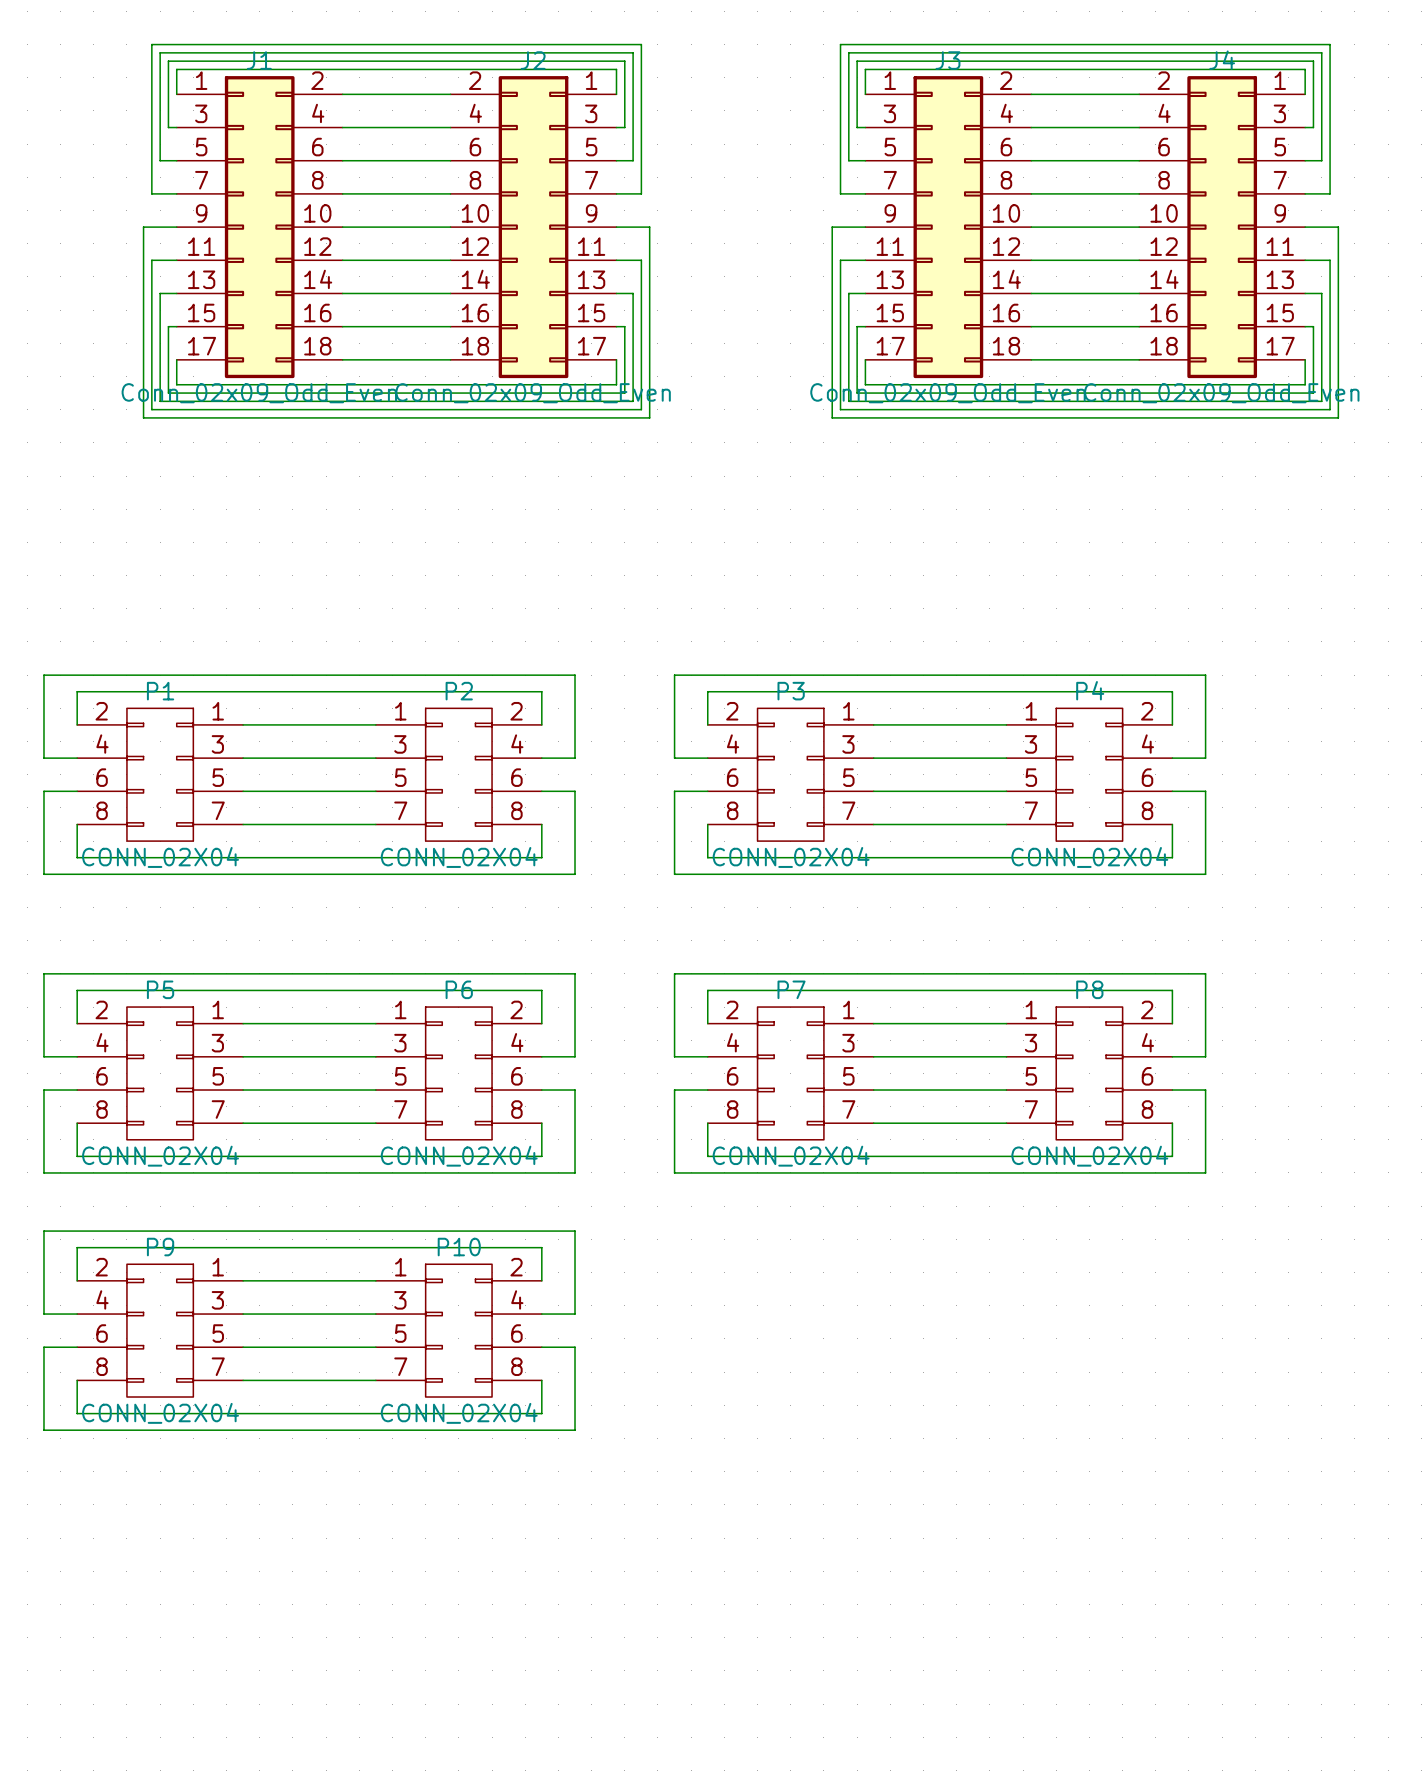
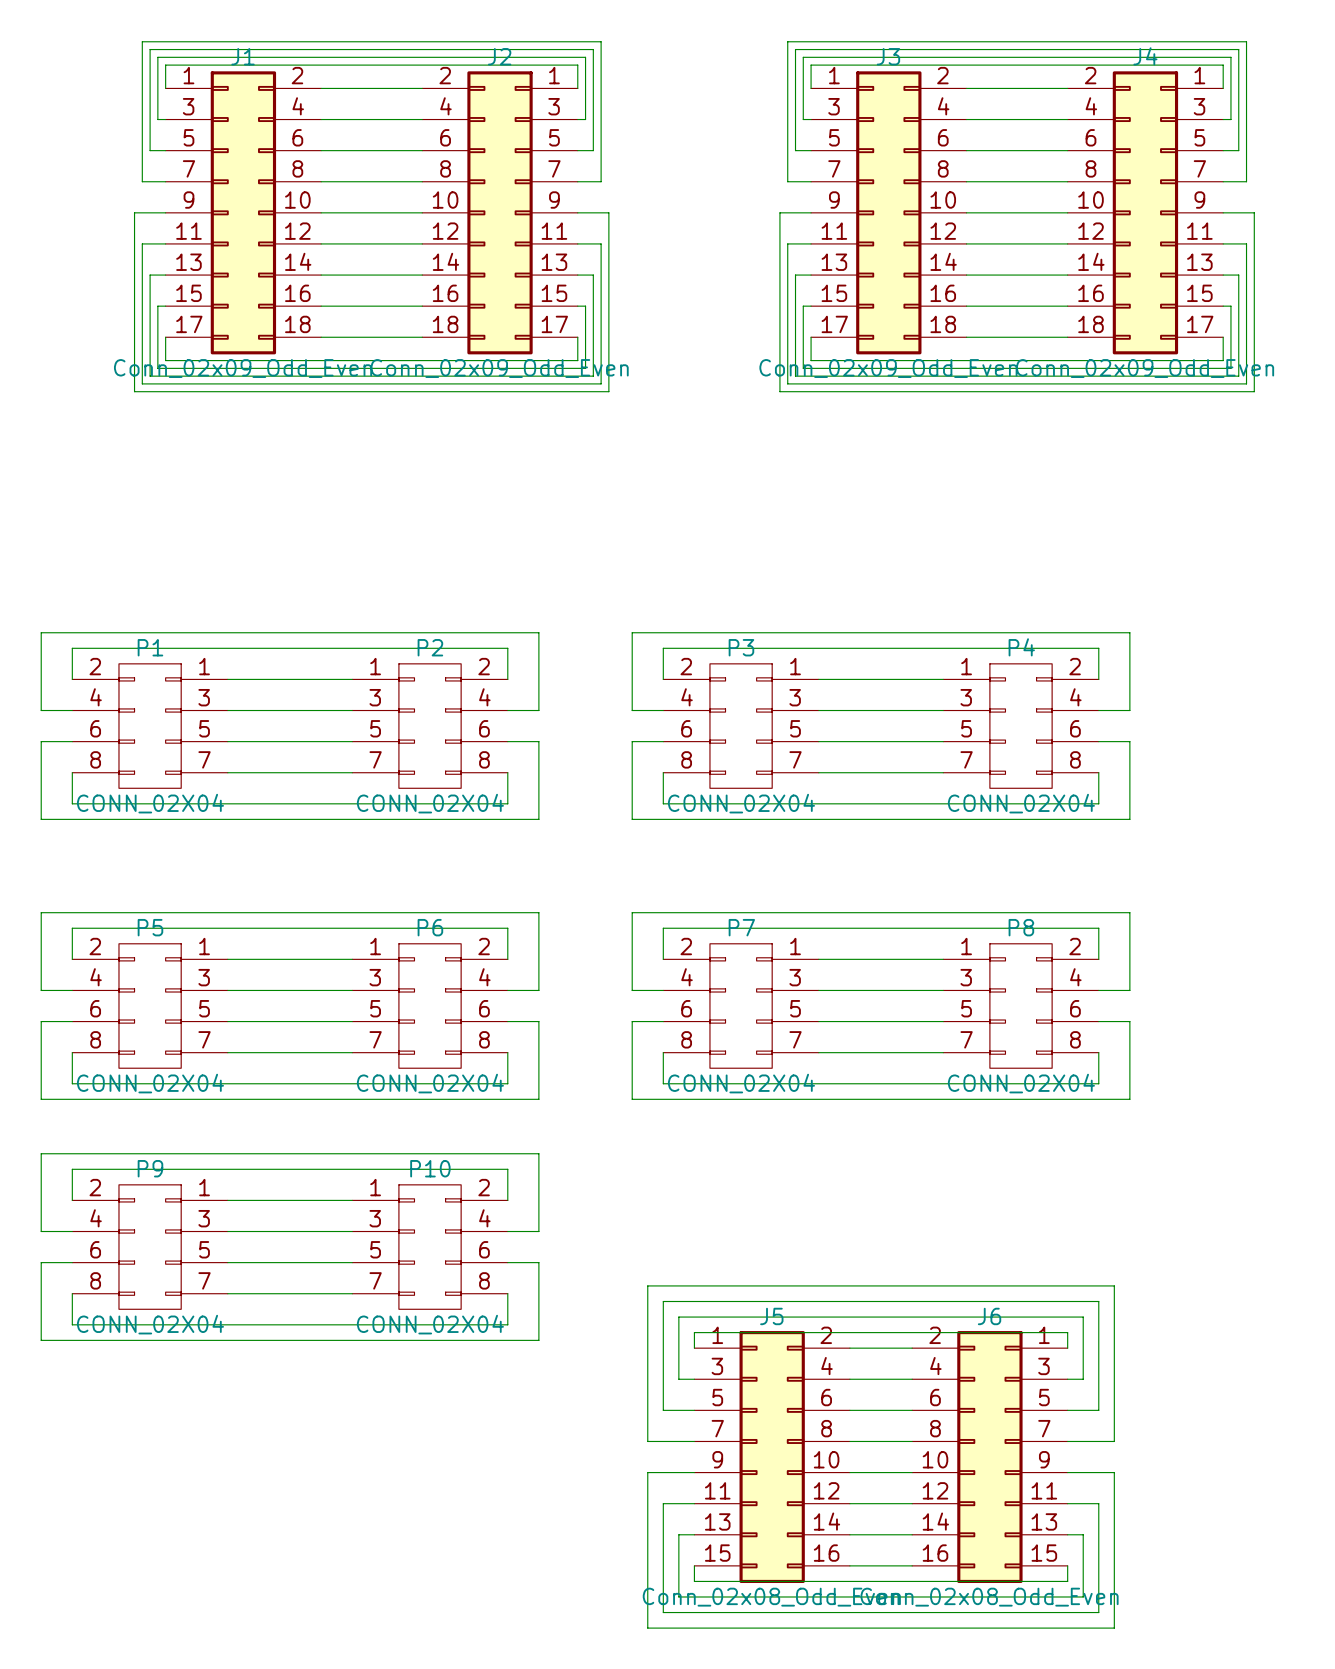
wire: none -> (694, 1348) (694, 1332) (1067, 1332) (1067, 1348)
wire: none -> (849, 1348) (912, 1348)
wire: none -> (694, 1379) (678, 1379) (678, 1317) (1083, 1317) (1083, 1379) (1067, 1379)
wire: none -> (849, 1379) (912, 1379)
wire: none -> (694, 1410) (663, 1410) (663, 1301) (1098, 1301) (1098, 1410) (1067, 1410)
wire: none -> (849, 1410) (912, 1410)
wire: none -> (694, 1441) (647, 1441) (647, 1285) (1114, 1285) (1114, 1441) (1067, 1441)
wire: none -> (849, 1441) (912, 1441)
J5: none -> Conn_02x08_Odd_Even (772, 1457)
J6: none -> Conn_02x08_Odd_Even (989, 1457)
wire: none -> (694, 1472) (647, 1472) (647, 1628) (1114, 1628) (1114, 1472) (1067, 1472)
wire: none -> (849, 1472) (912, 1472)
wire: none -> (694, 1503) (663, 1503) (663, 1612) (1098, 1612) (1098, 1503) (1067, 1503)
wire: none -> (849, 1503) (912, 1503)
wire: none -> (694, 1534) (678, 1534) (678, 1596) (1083, 1596) (1083, 1534) (1067, 1534)
wire: none -> (849, 1534) (912, 1534)
wire: none -> (694, 1565) (694, 1581) (1067, 1581) (1067, 1565)
wire: none -> (849, 1565) (912, 1565)

